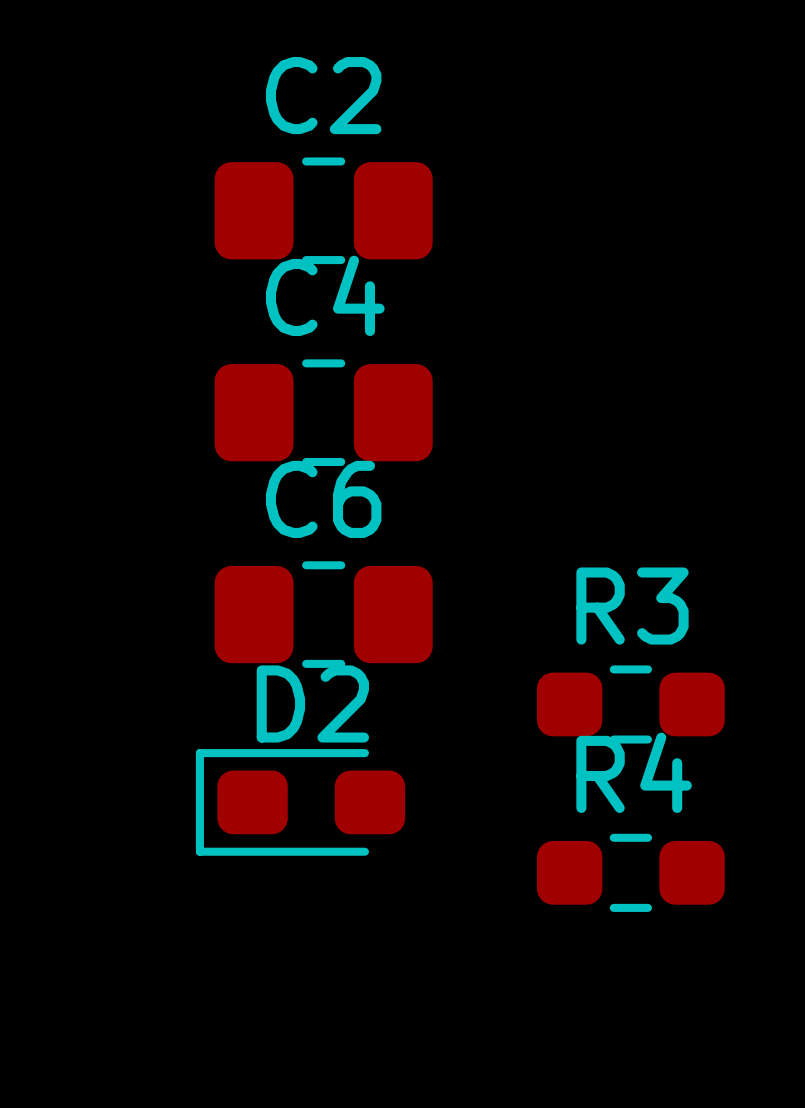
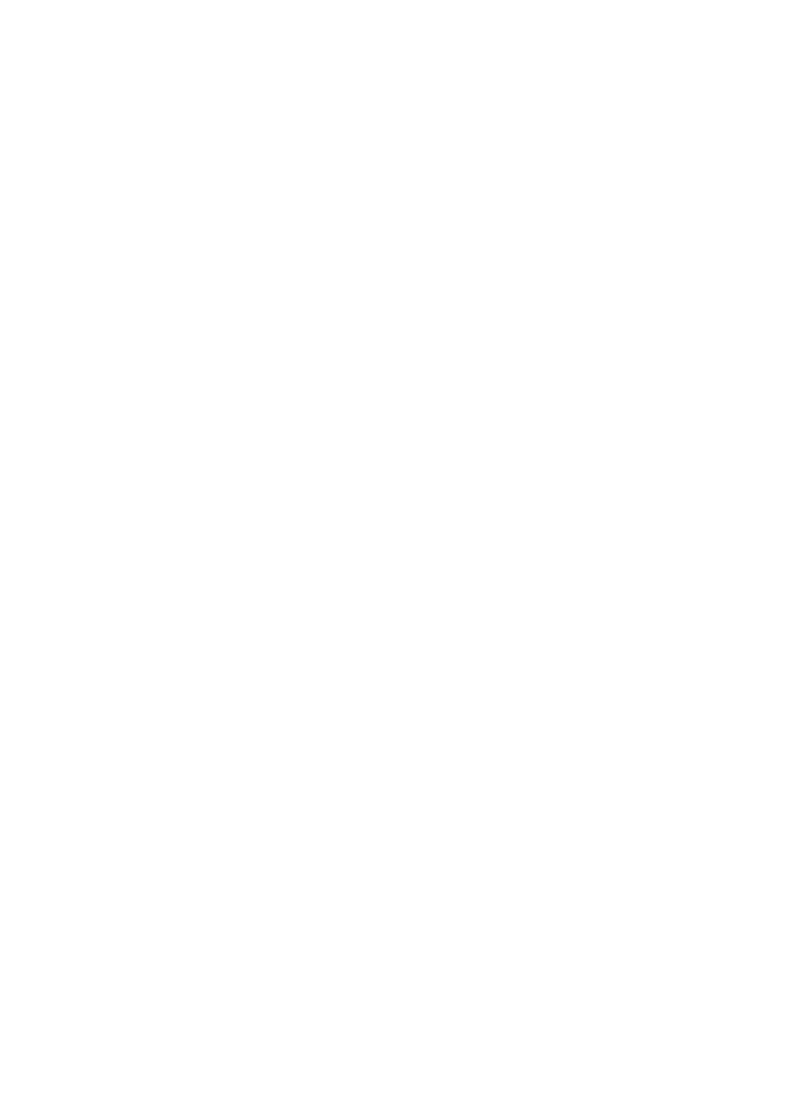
C2: (323, 210) -> none
C4: (323, 412) -> none
C6: (323, 614) -> none
R3: (630, 704) -> none
D2: (300, 802) -> none
R4: (630, 872) -> none

